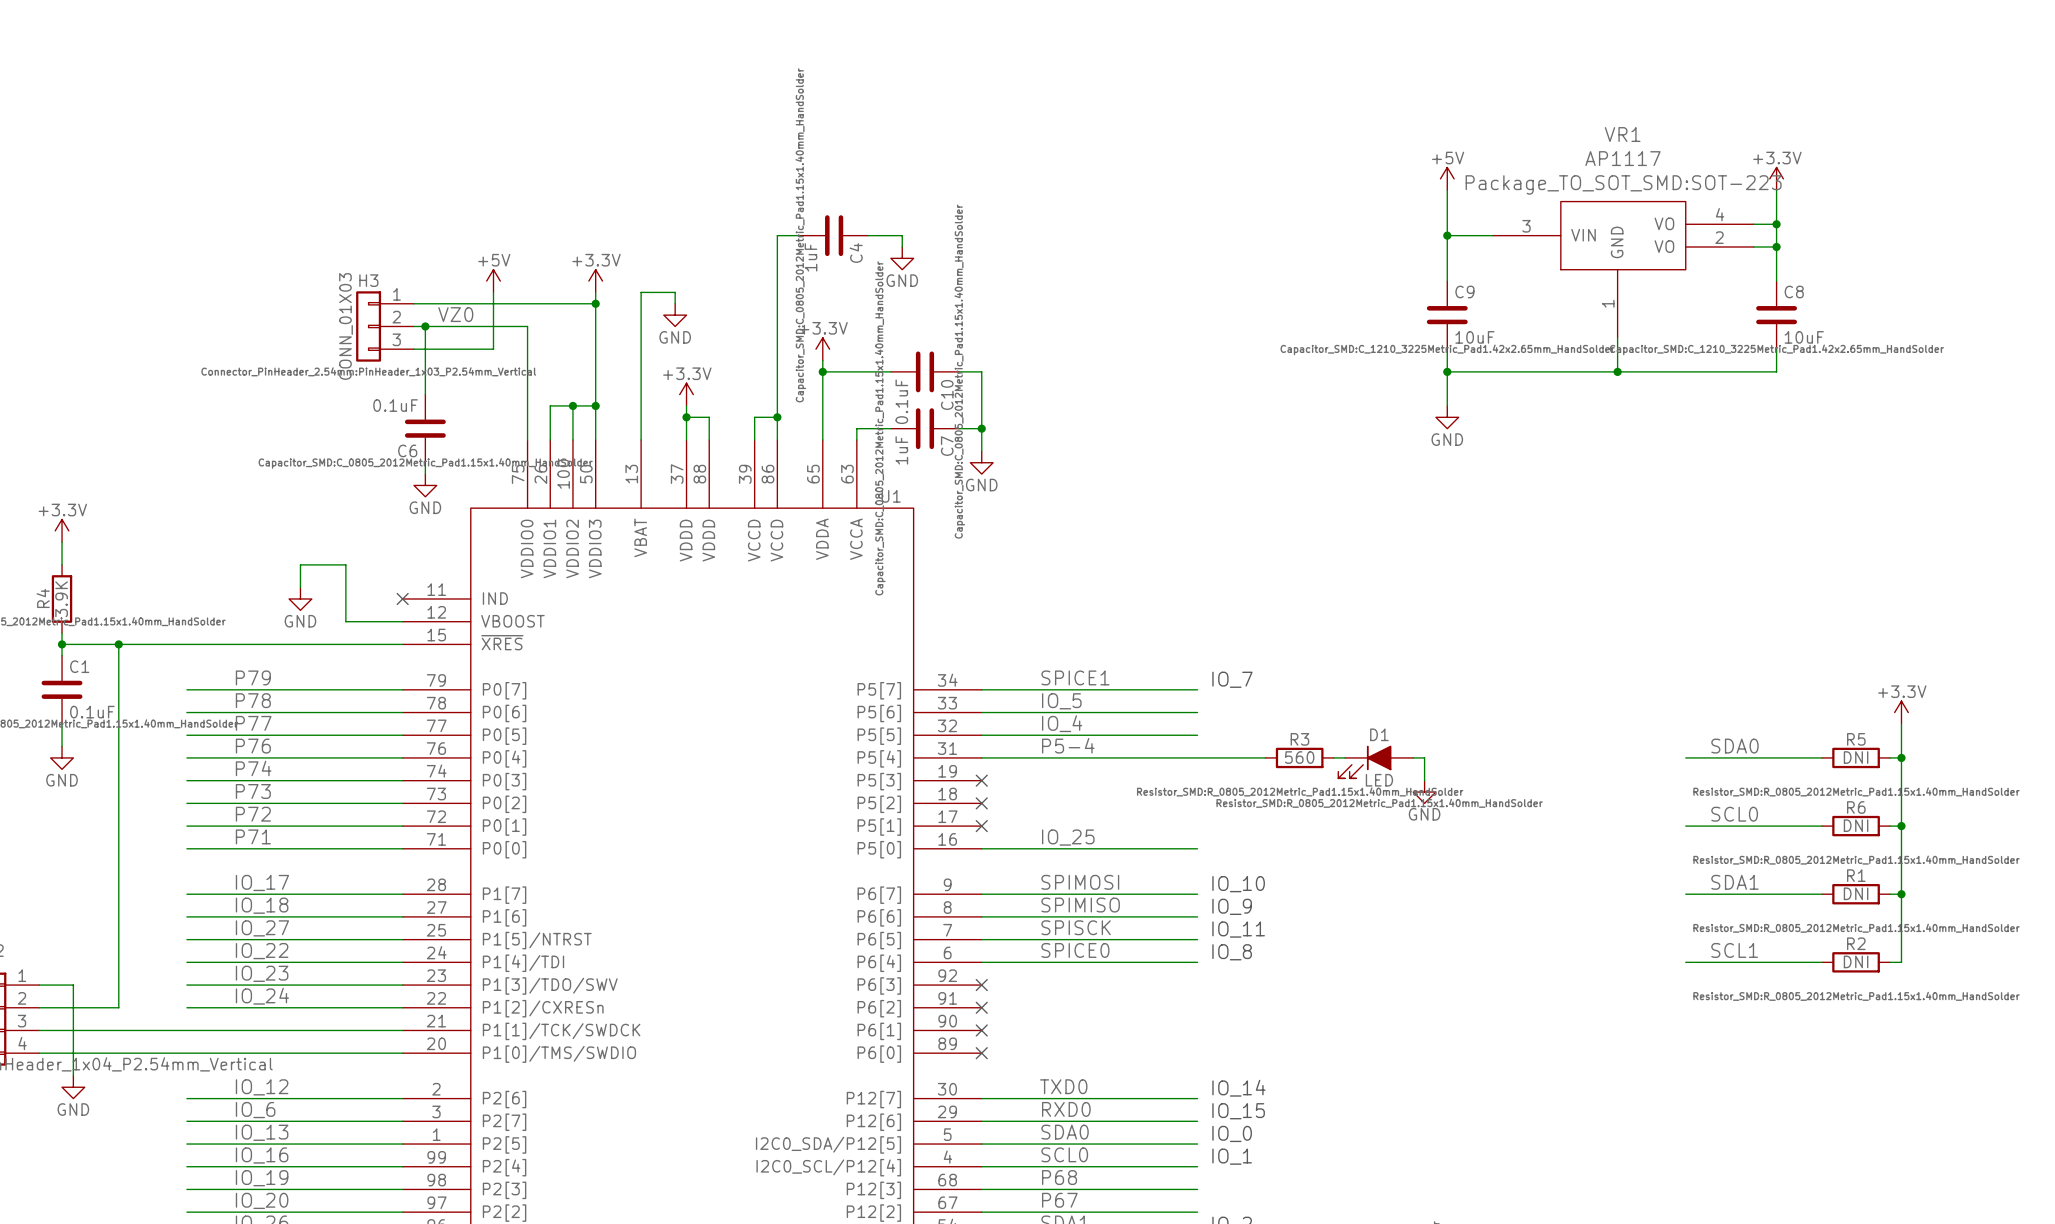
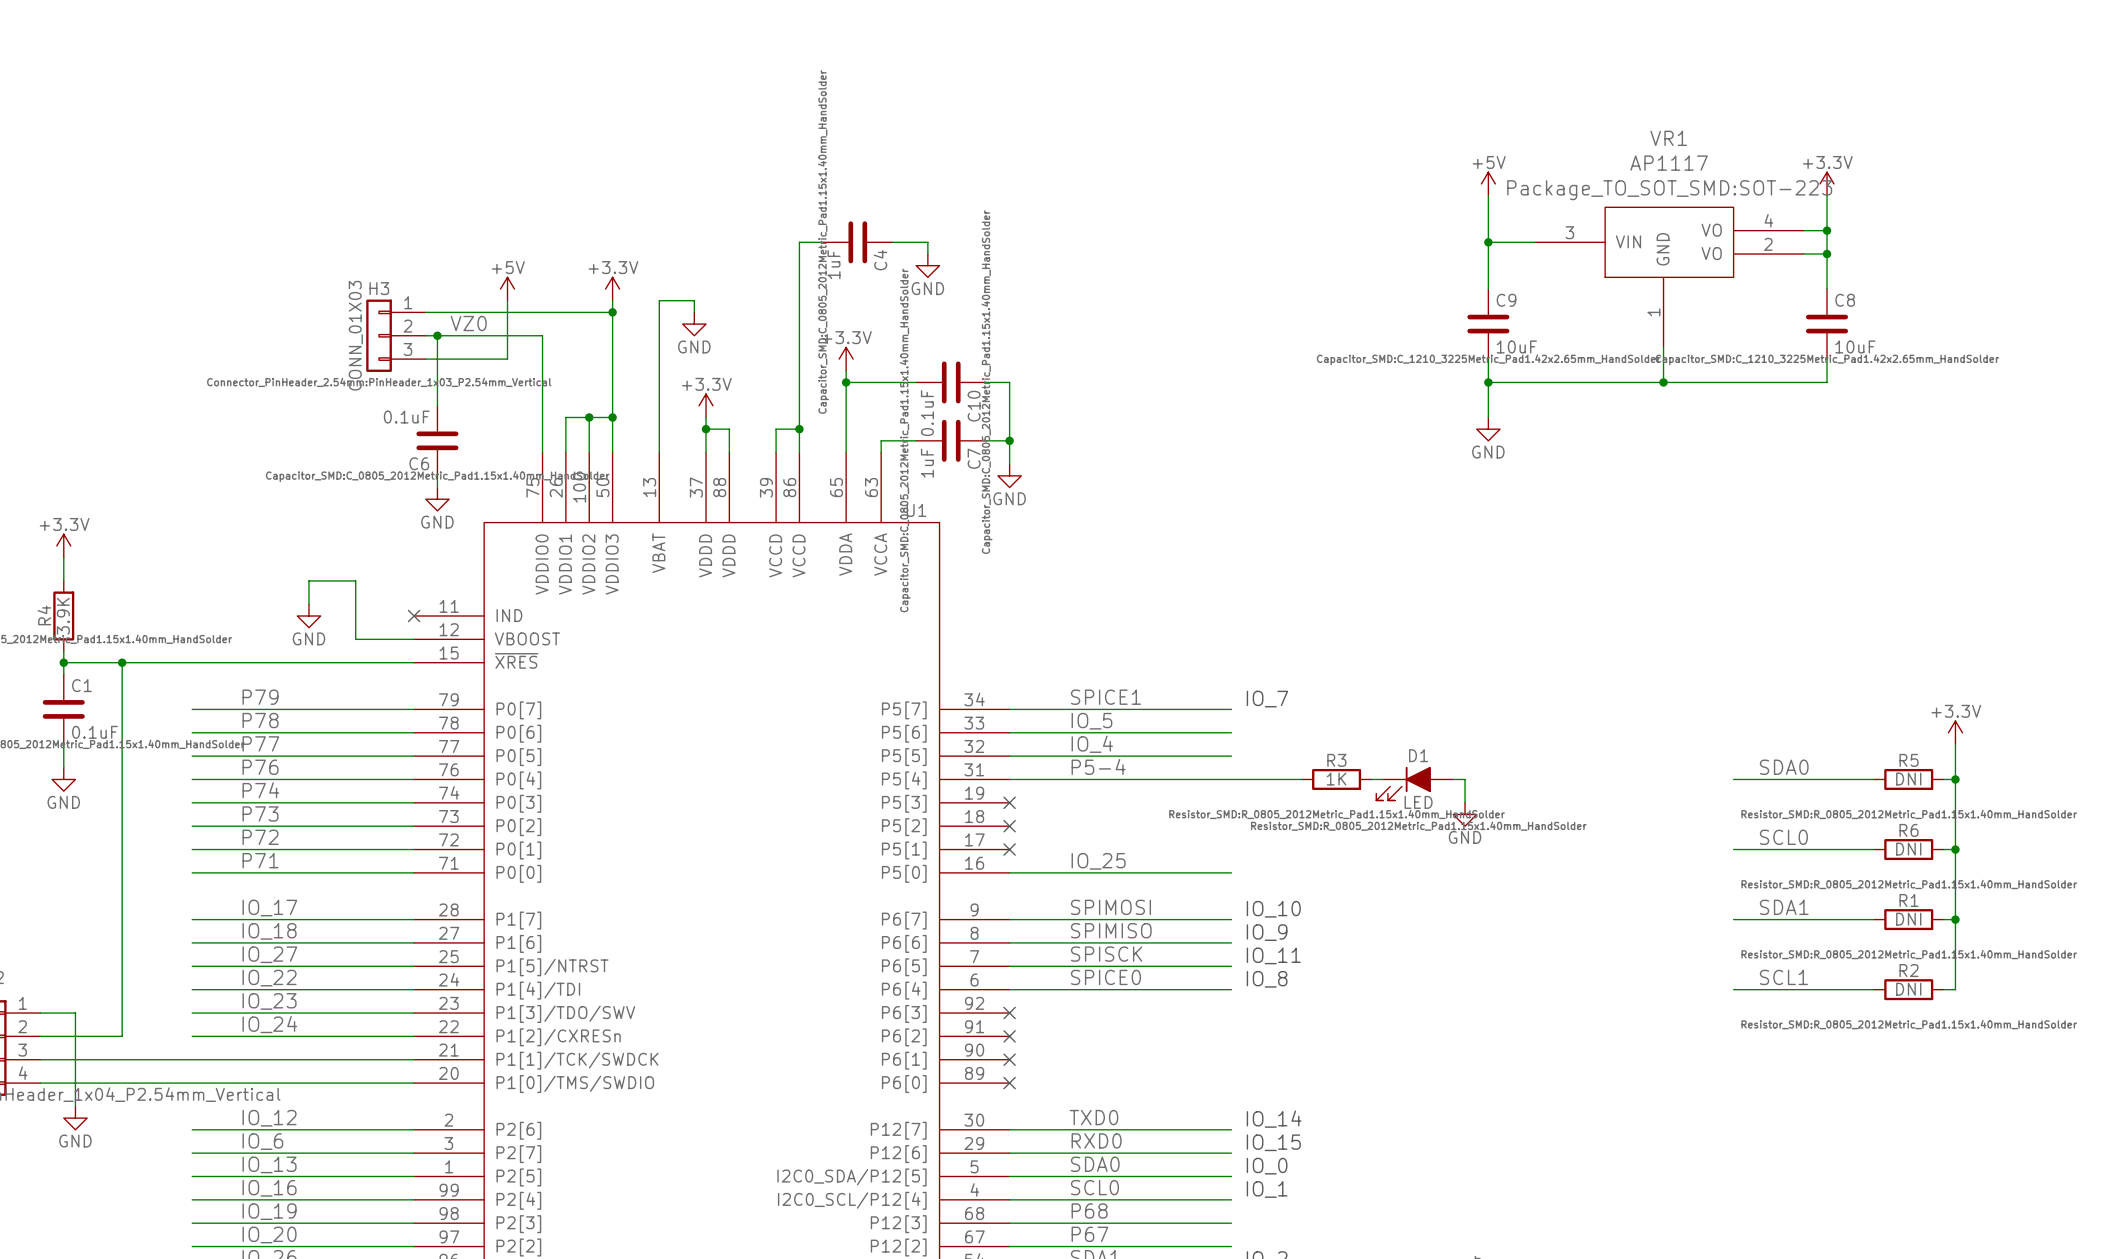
R3 value: 560 (1299, 757) -> 1K (1336, 779)

